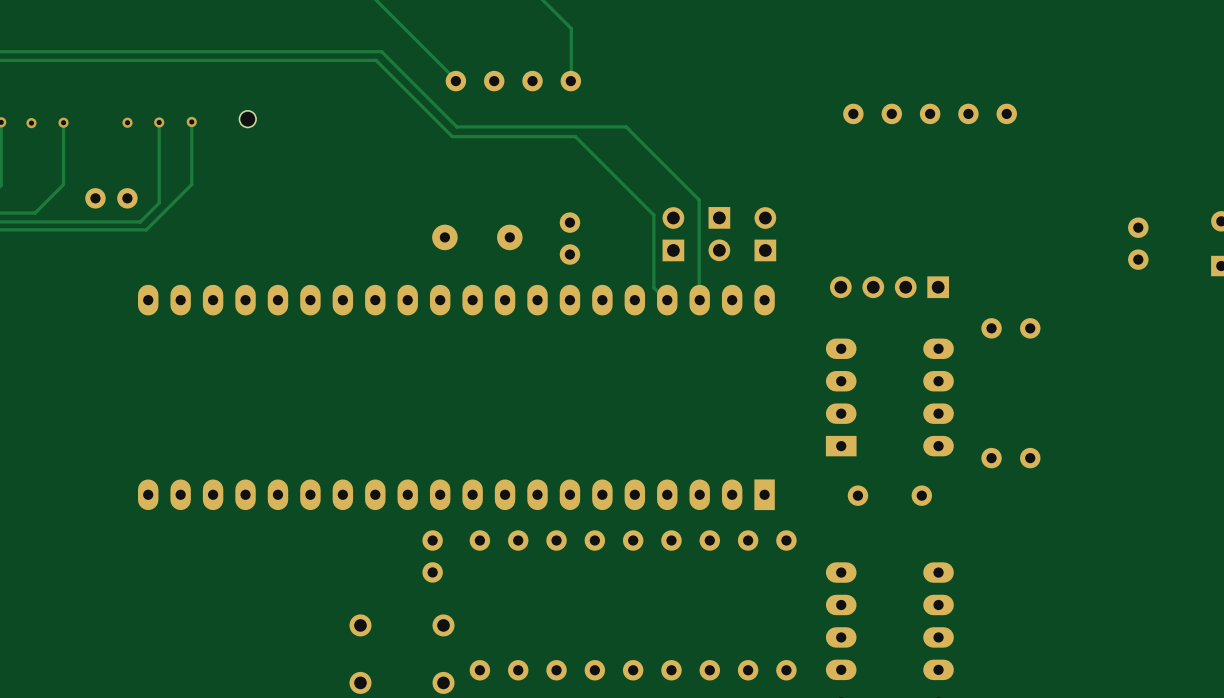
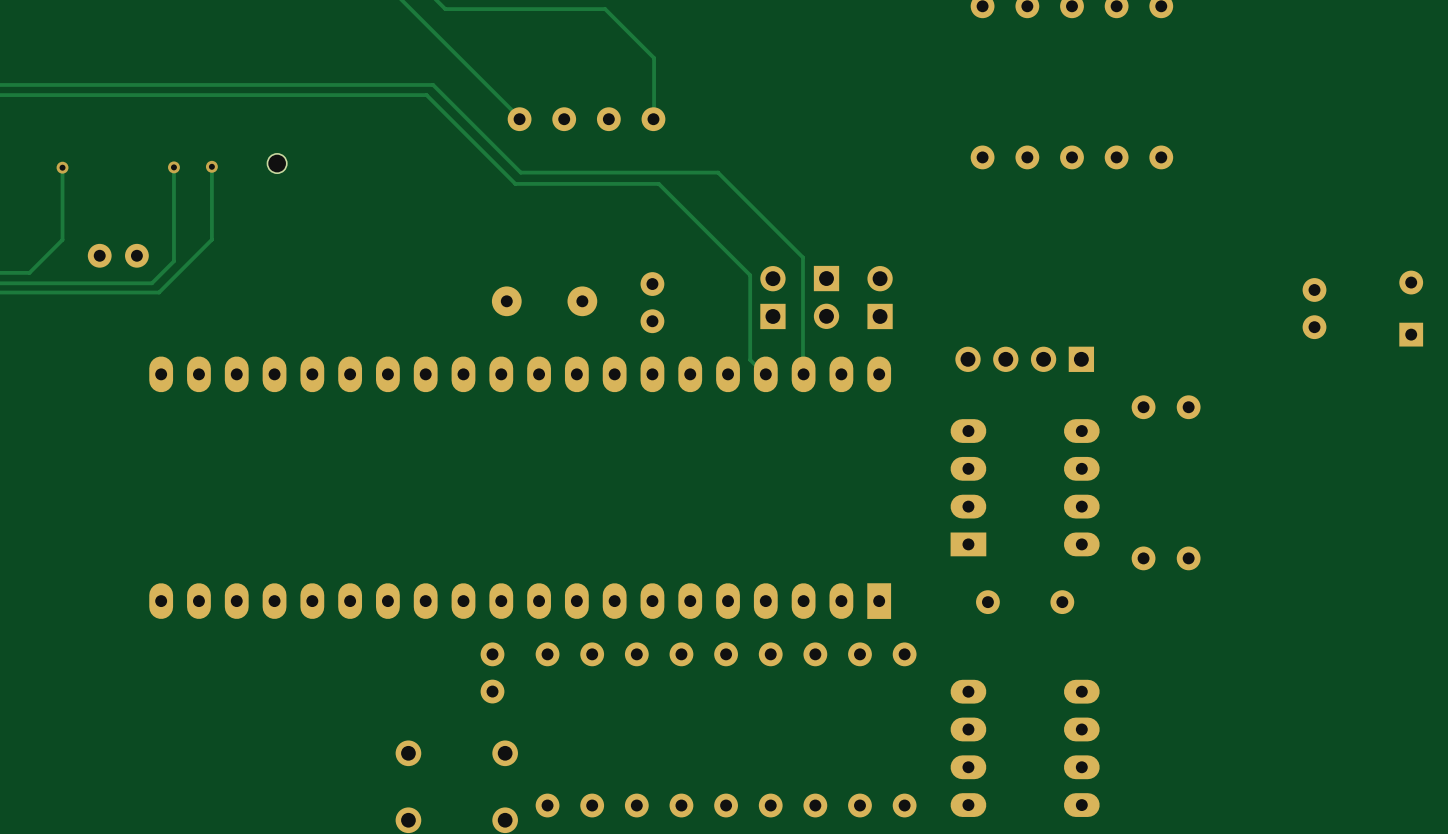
via: (127, 122) -> none
via: (31, 123) -> none

